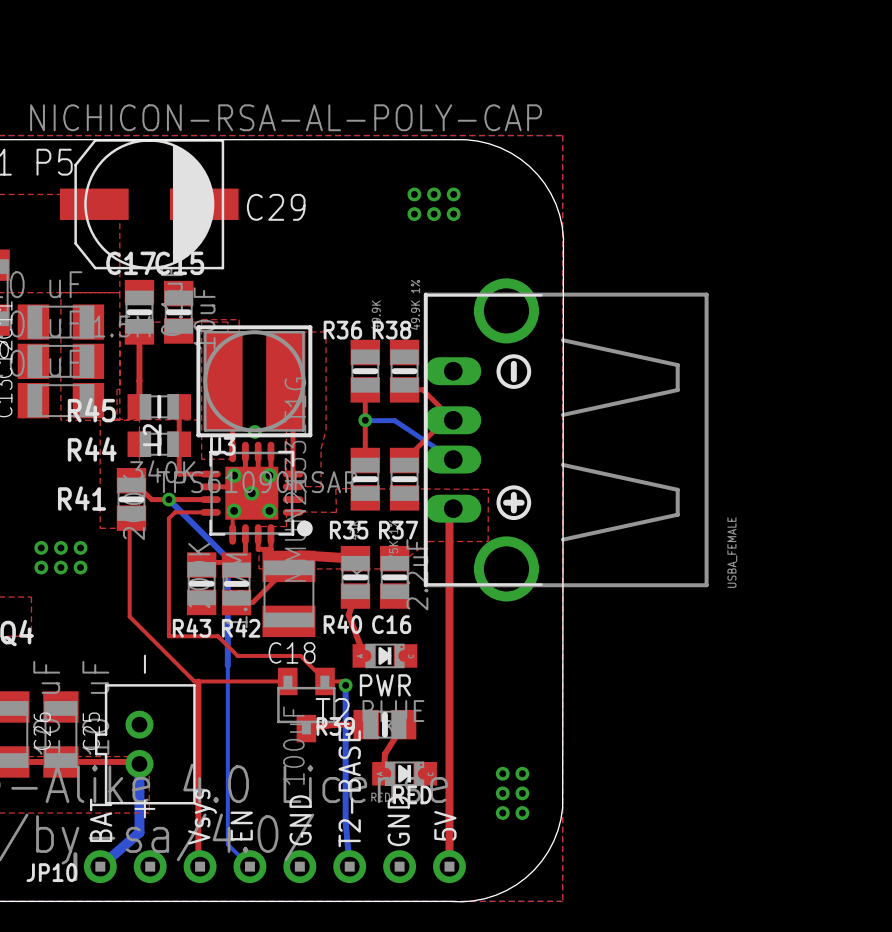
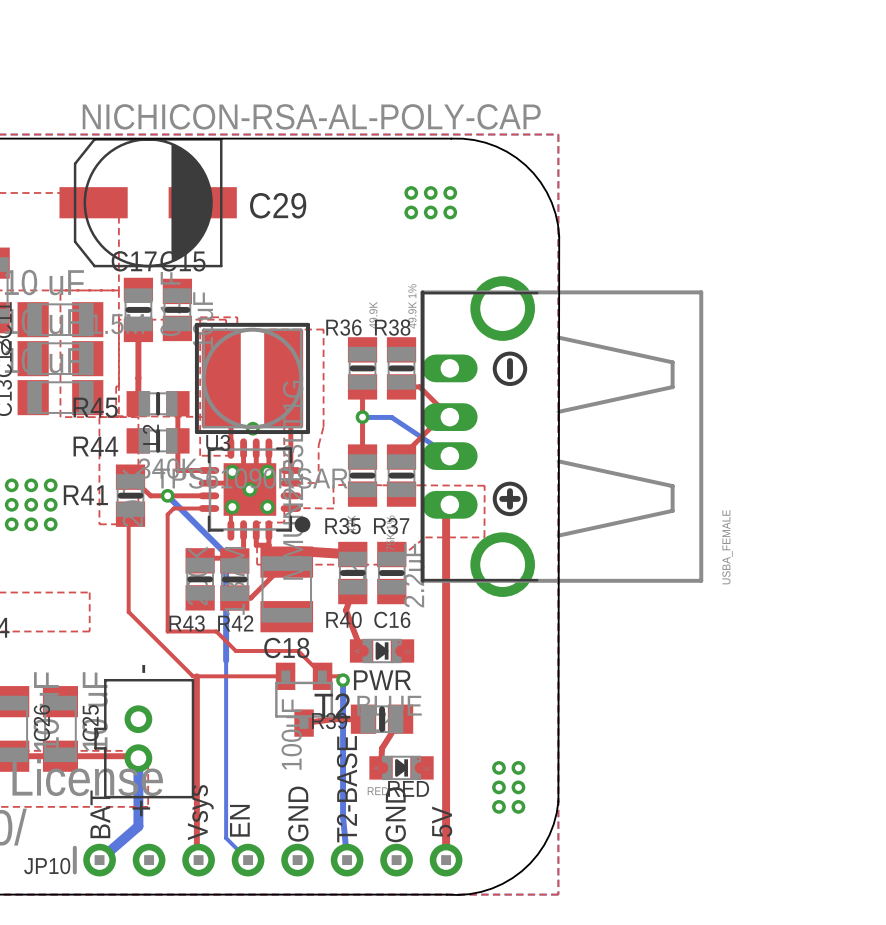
via: none -> (11, 485)
via: none -> (31, 485)
via: none -> (50, 485)
via: none -> (11, 504)
via: none -> (31, 504)
via: none -> (50, 504)
via: none -> (11, 524)
via: none -> (31, 524)
via: none -> (50, 524)
via: (41, 547) -> none
via: (60, 547) -> none
via: (80, 547) -> none
via: (41, 567) -> none
via: (60, 567) -> none
via: (80, 567) -> none
top zone outline: (31, 597) (31, 636) -> (31, 592) (89, 592) (89, 631) (31, 631)

